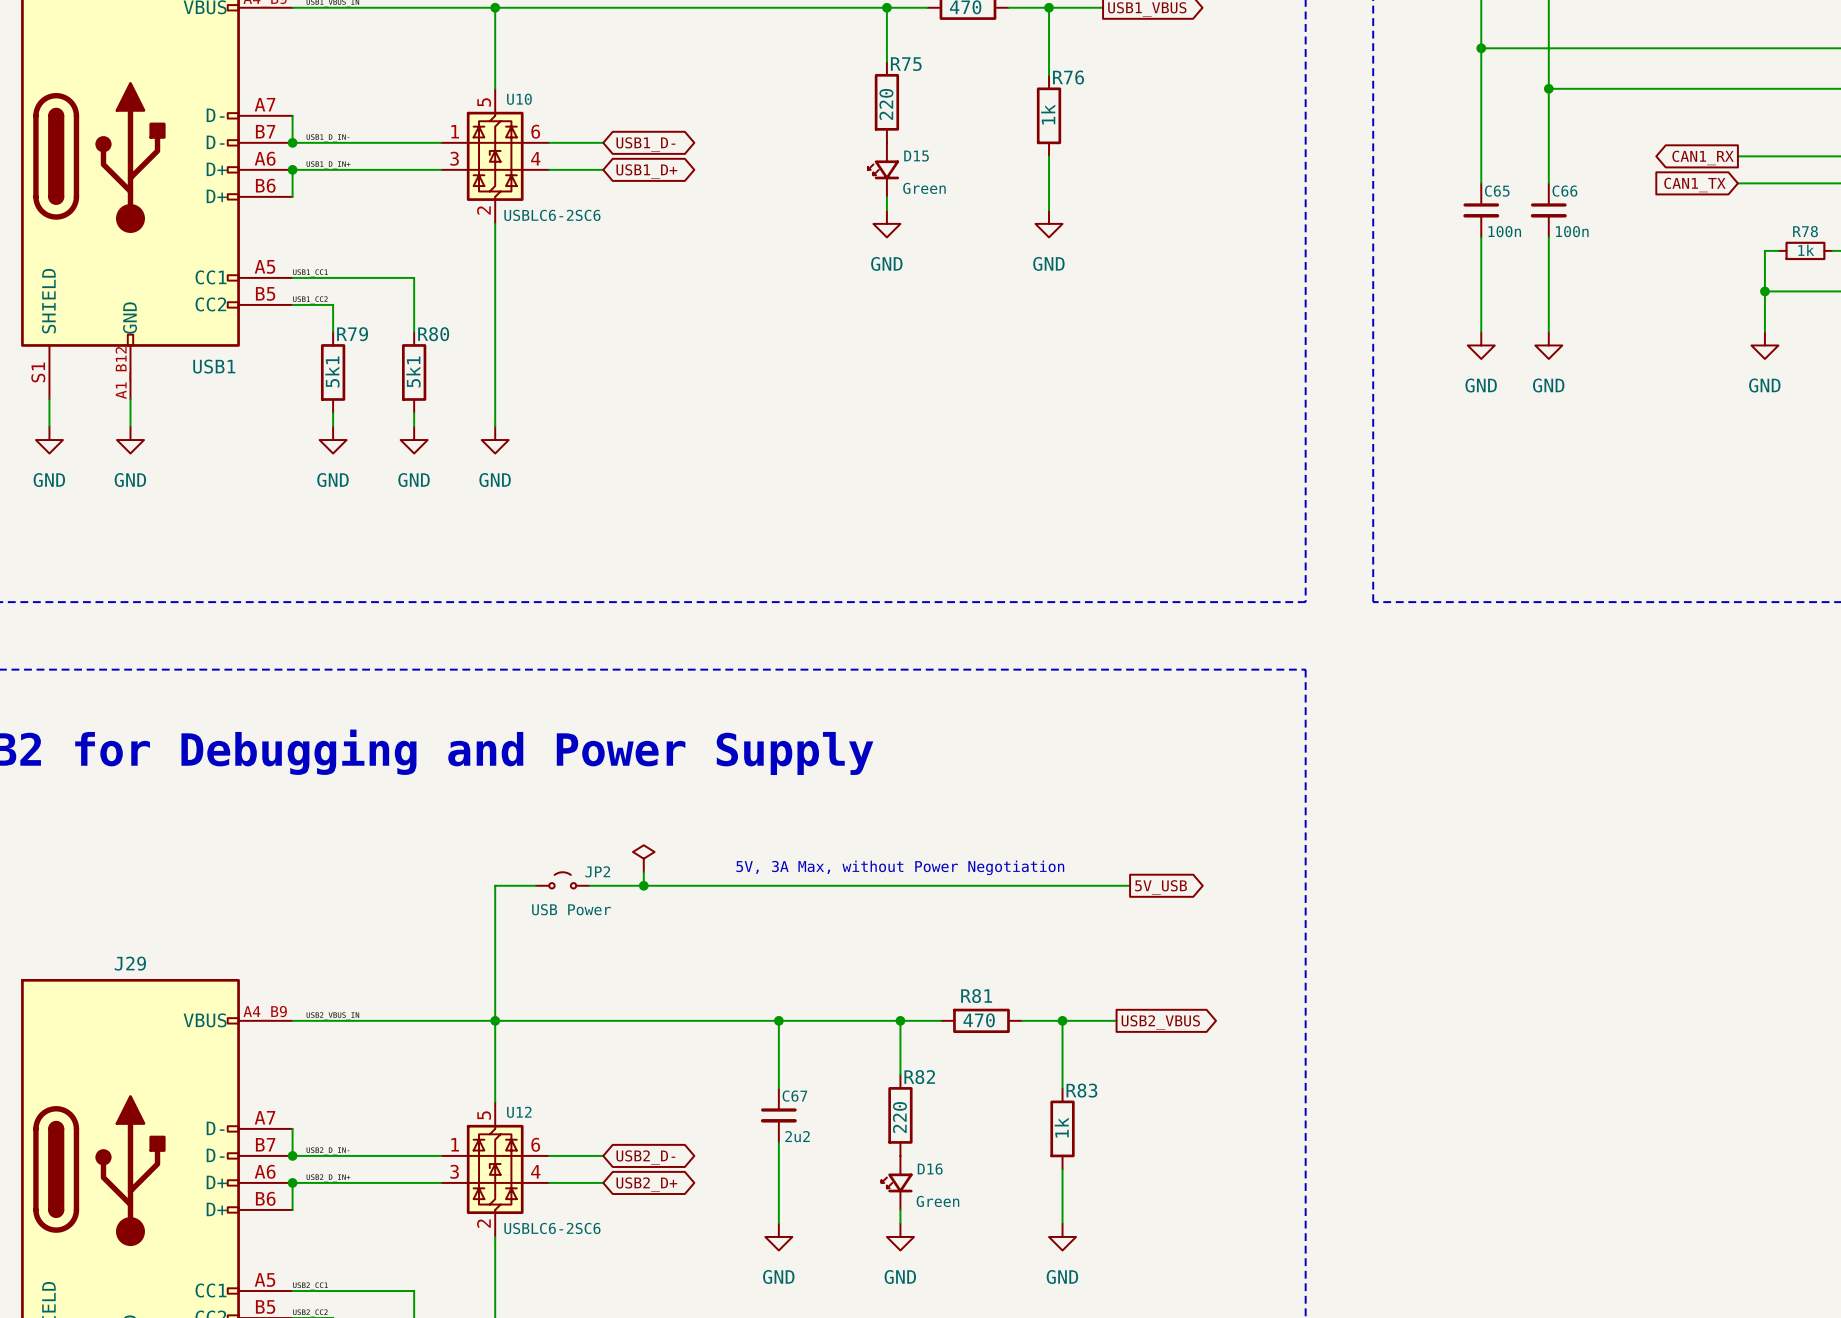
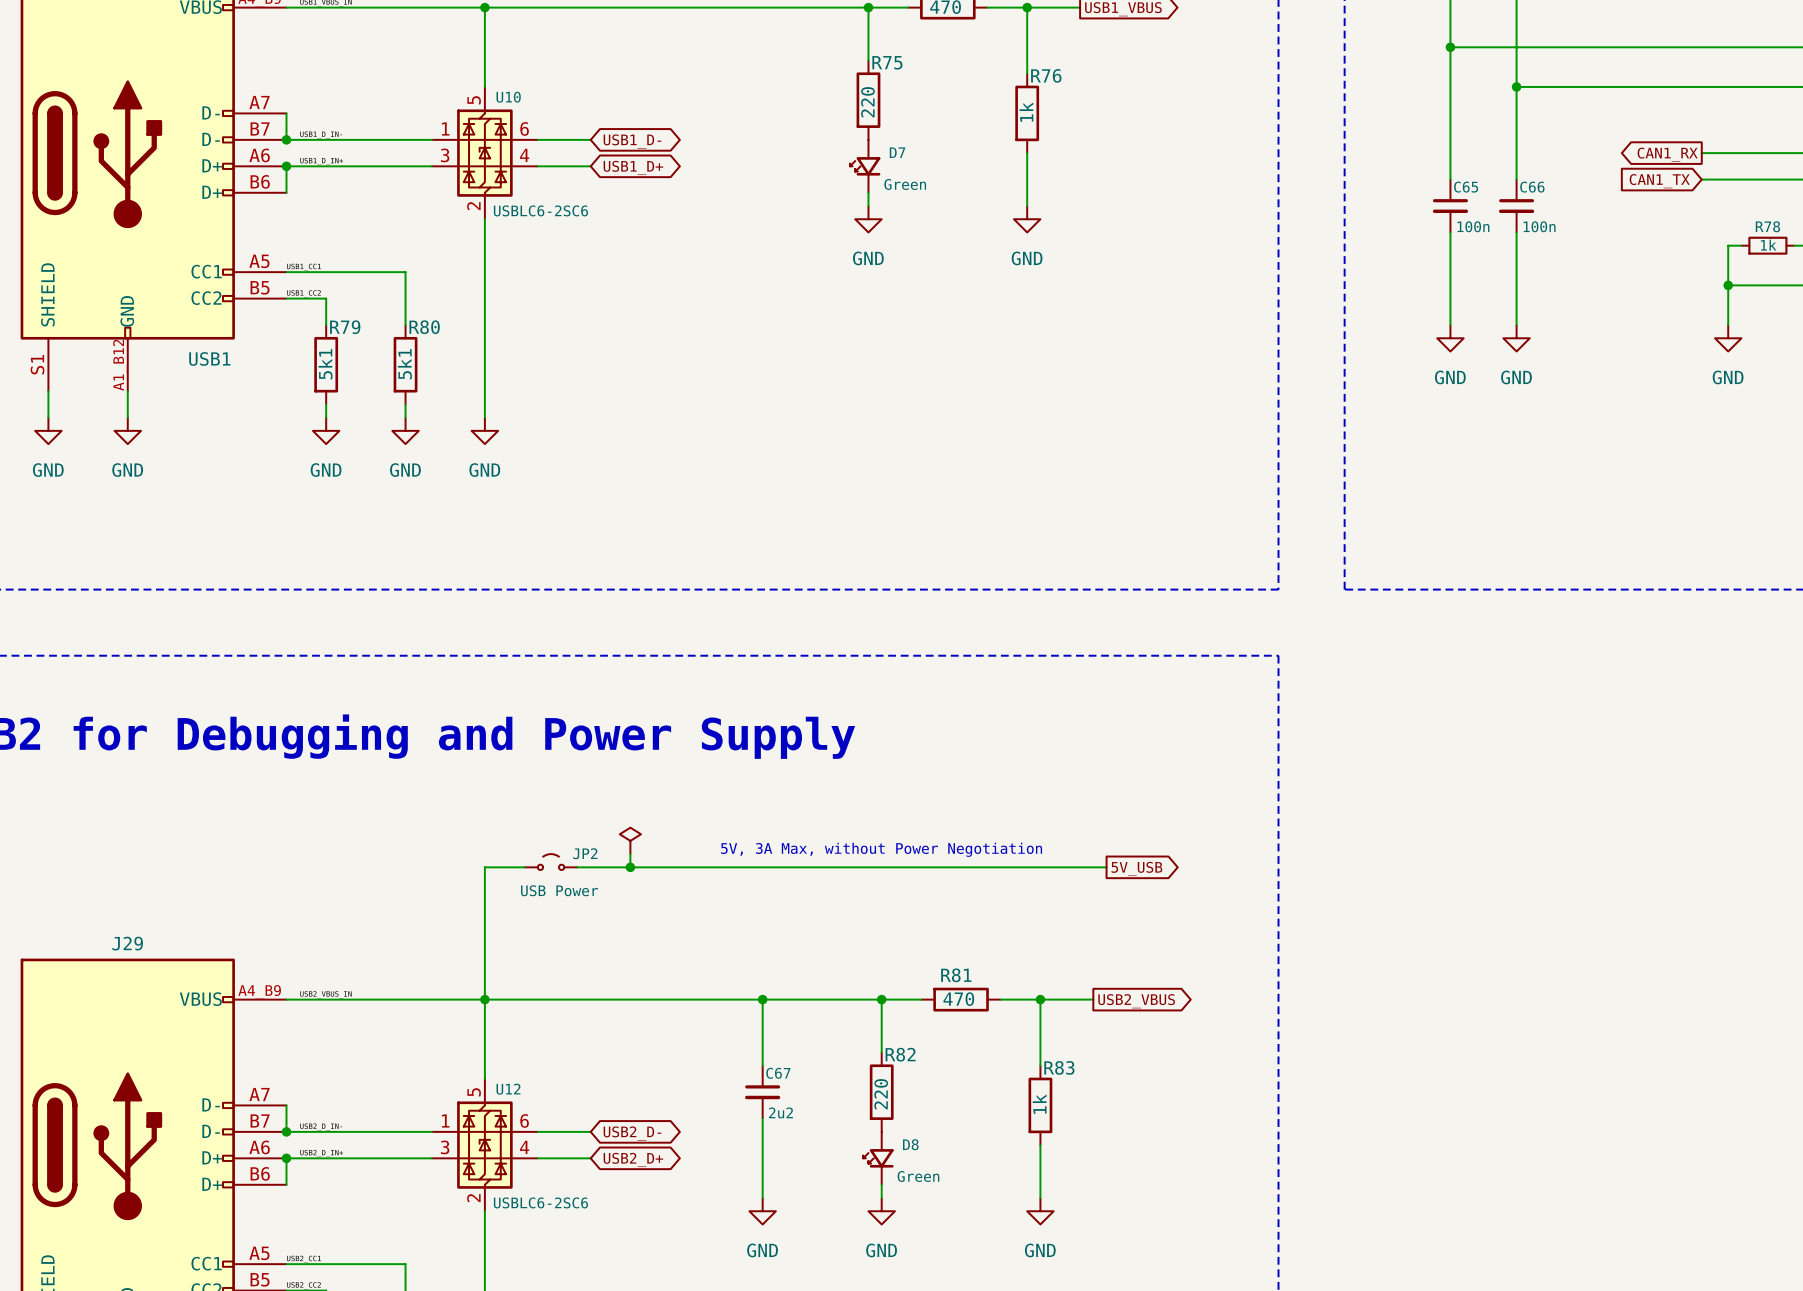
D15 name: D15 (916, 156) -> D7 (897, 152)
D16 name: D16 (930, 1169) -> D8 (910, 1144)

